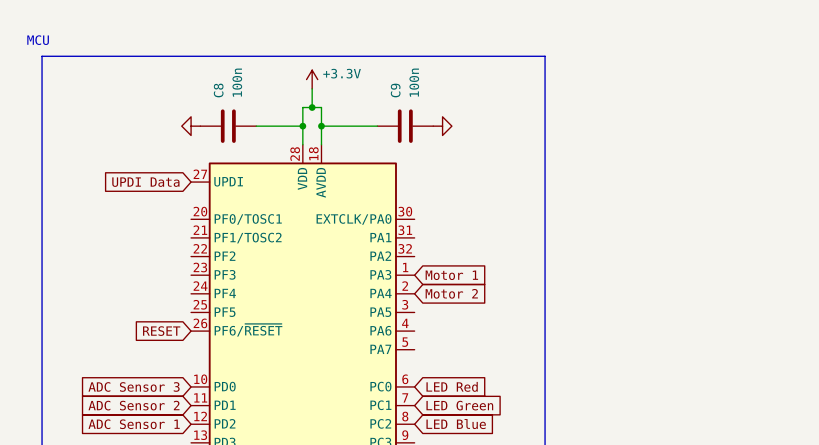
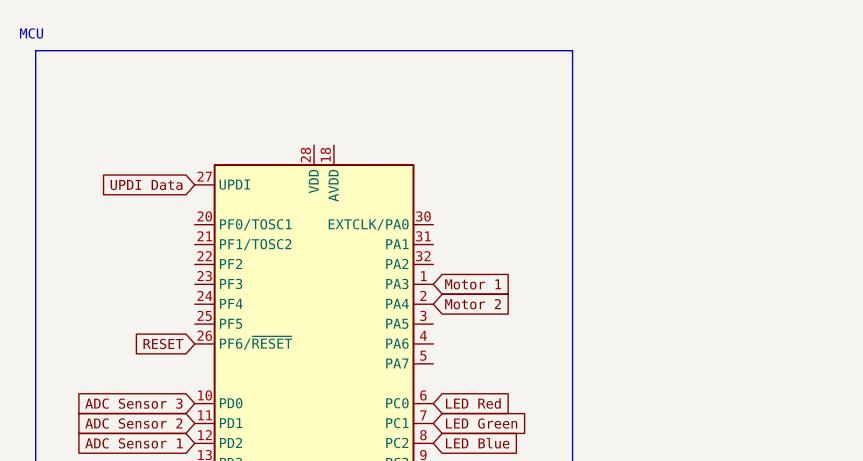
power symbol: +3.3V (312, 79) -> none
wire: (312, 88) (312, 107) -> none
junction: (312, 107) -> none
power symbol: (191, 126) -> none
C8: 100n (228, 126) -> none
wire: (256, 126) (302, 126) -> none
junction: (302, 126) -> none
wire: (321, 126) (377, 126) -> none
junction: (321, 126) -> none
C9: 100n (405, 126) -> none
power symbol: (442, 126) -> none
wire: (302, 144) (302, 107) (321, 107) (321, 144) -> none

